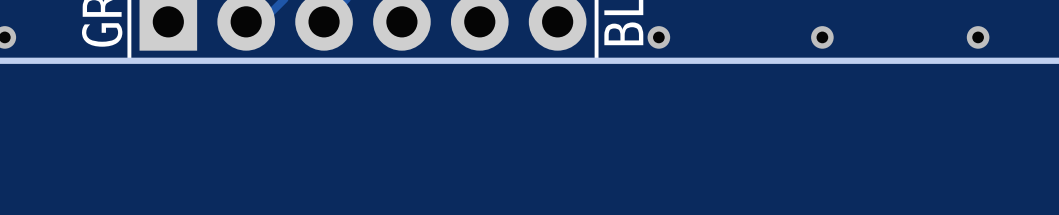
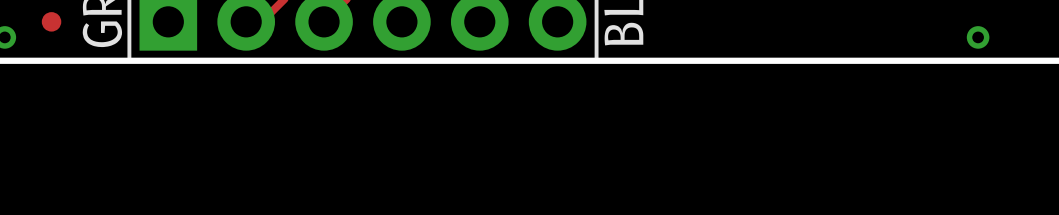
part: none -> (51, 21)
via: (658, 37) -> none
via: (822, 37) -> none

